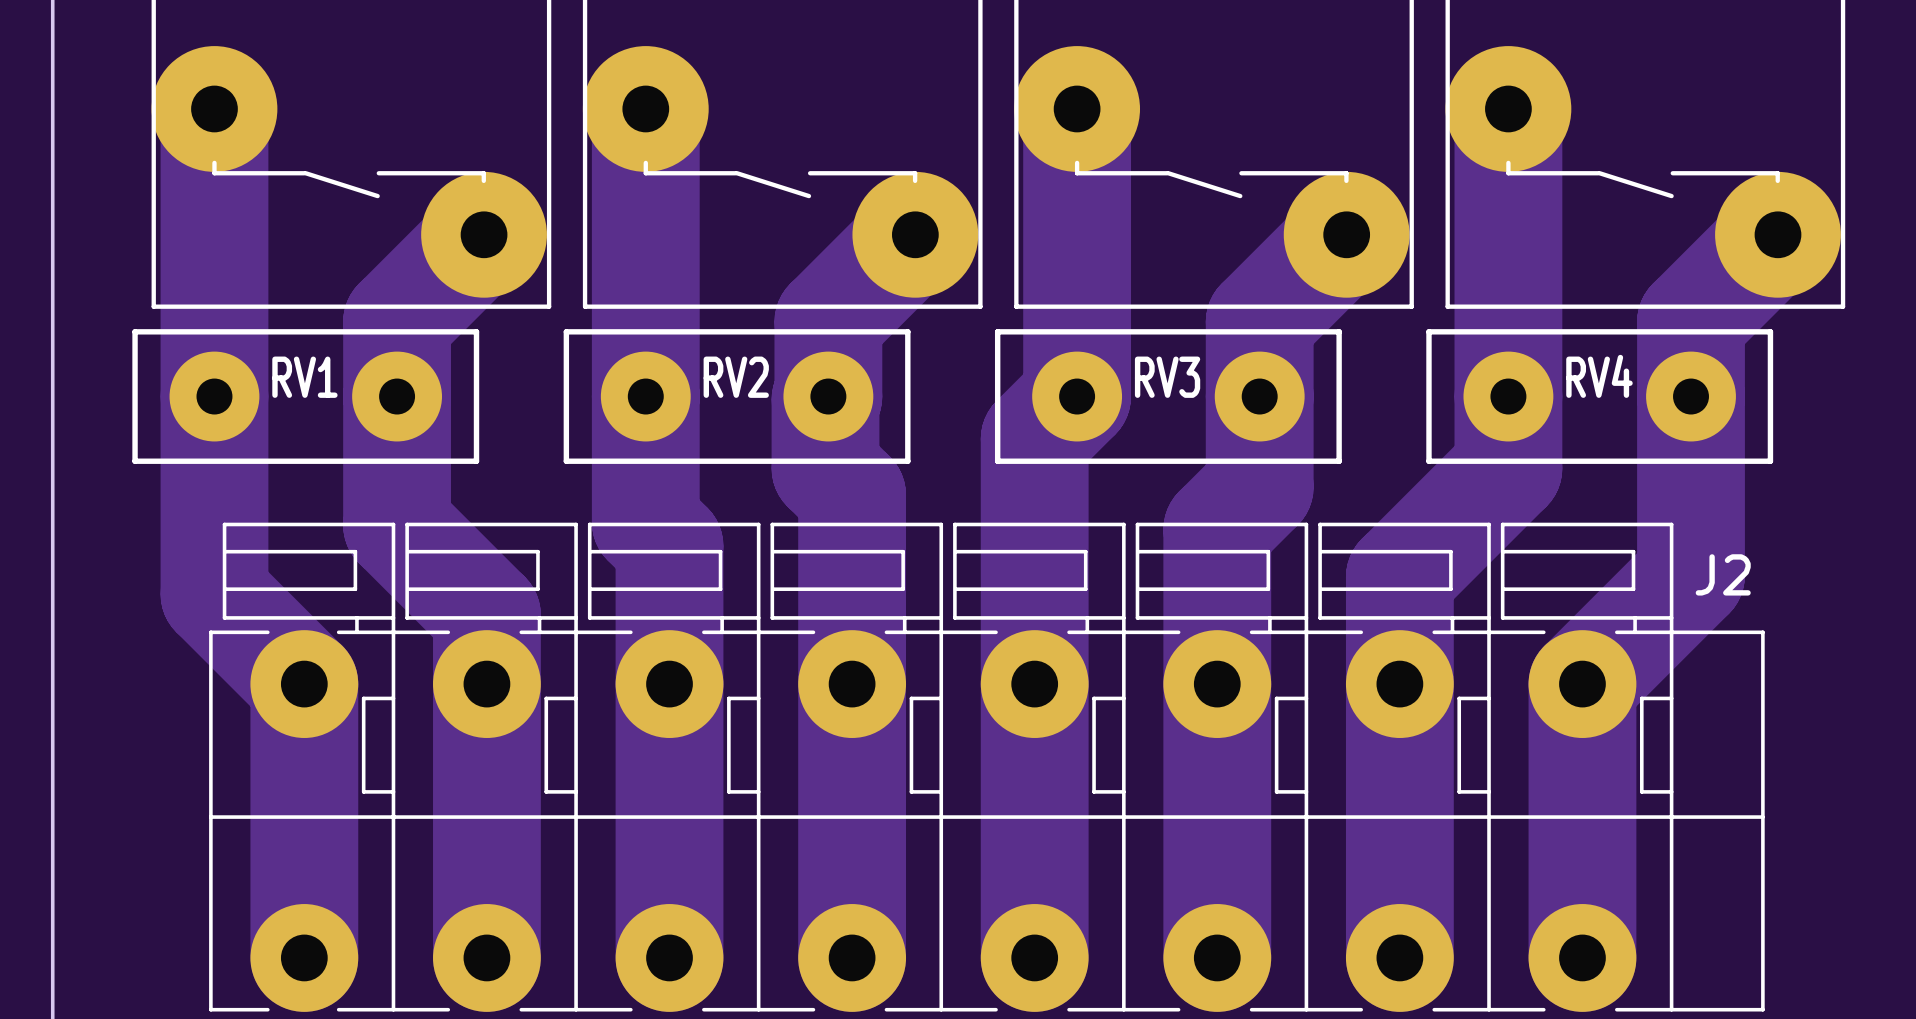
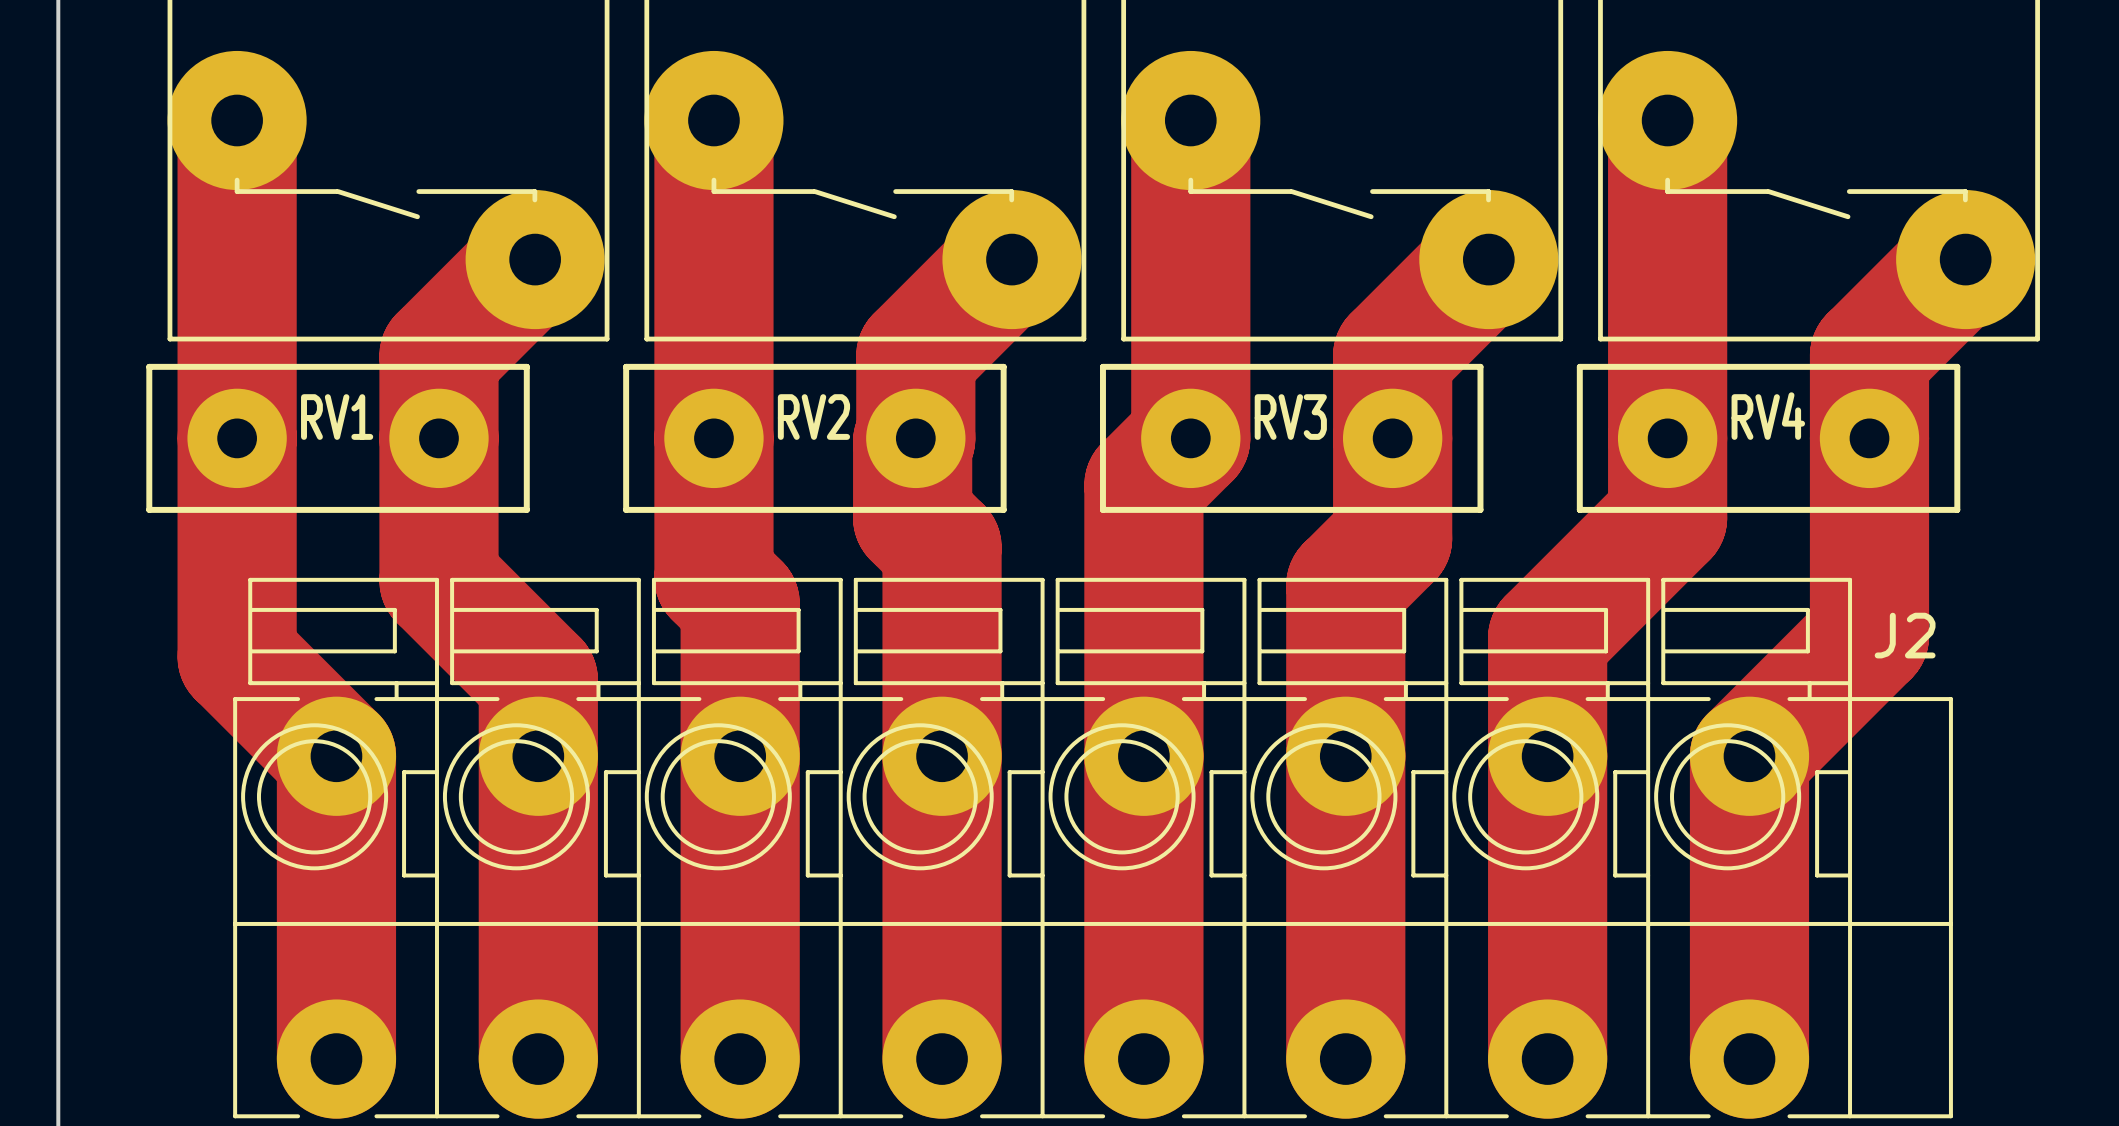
J2 footprint: [209, 522, 1765, 1012] -> [233, 577, 1953, 1119]

